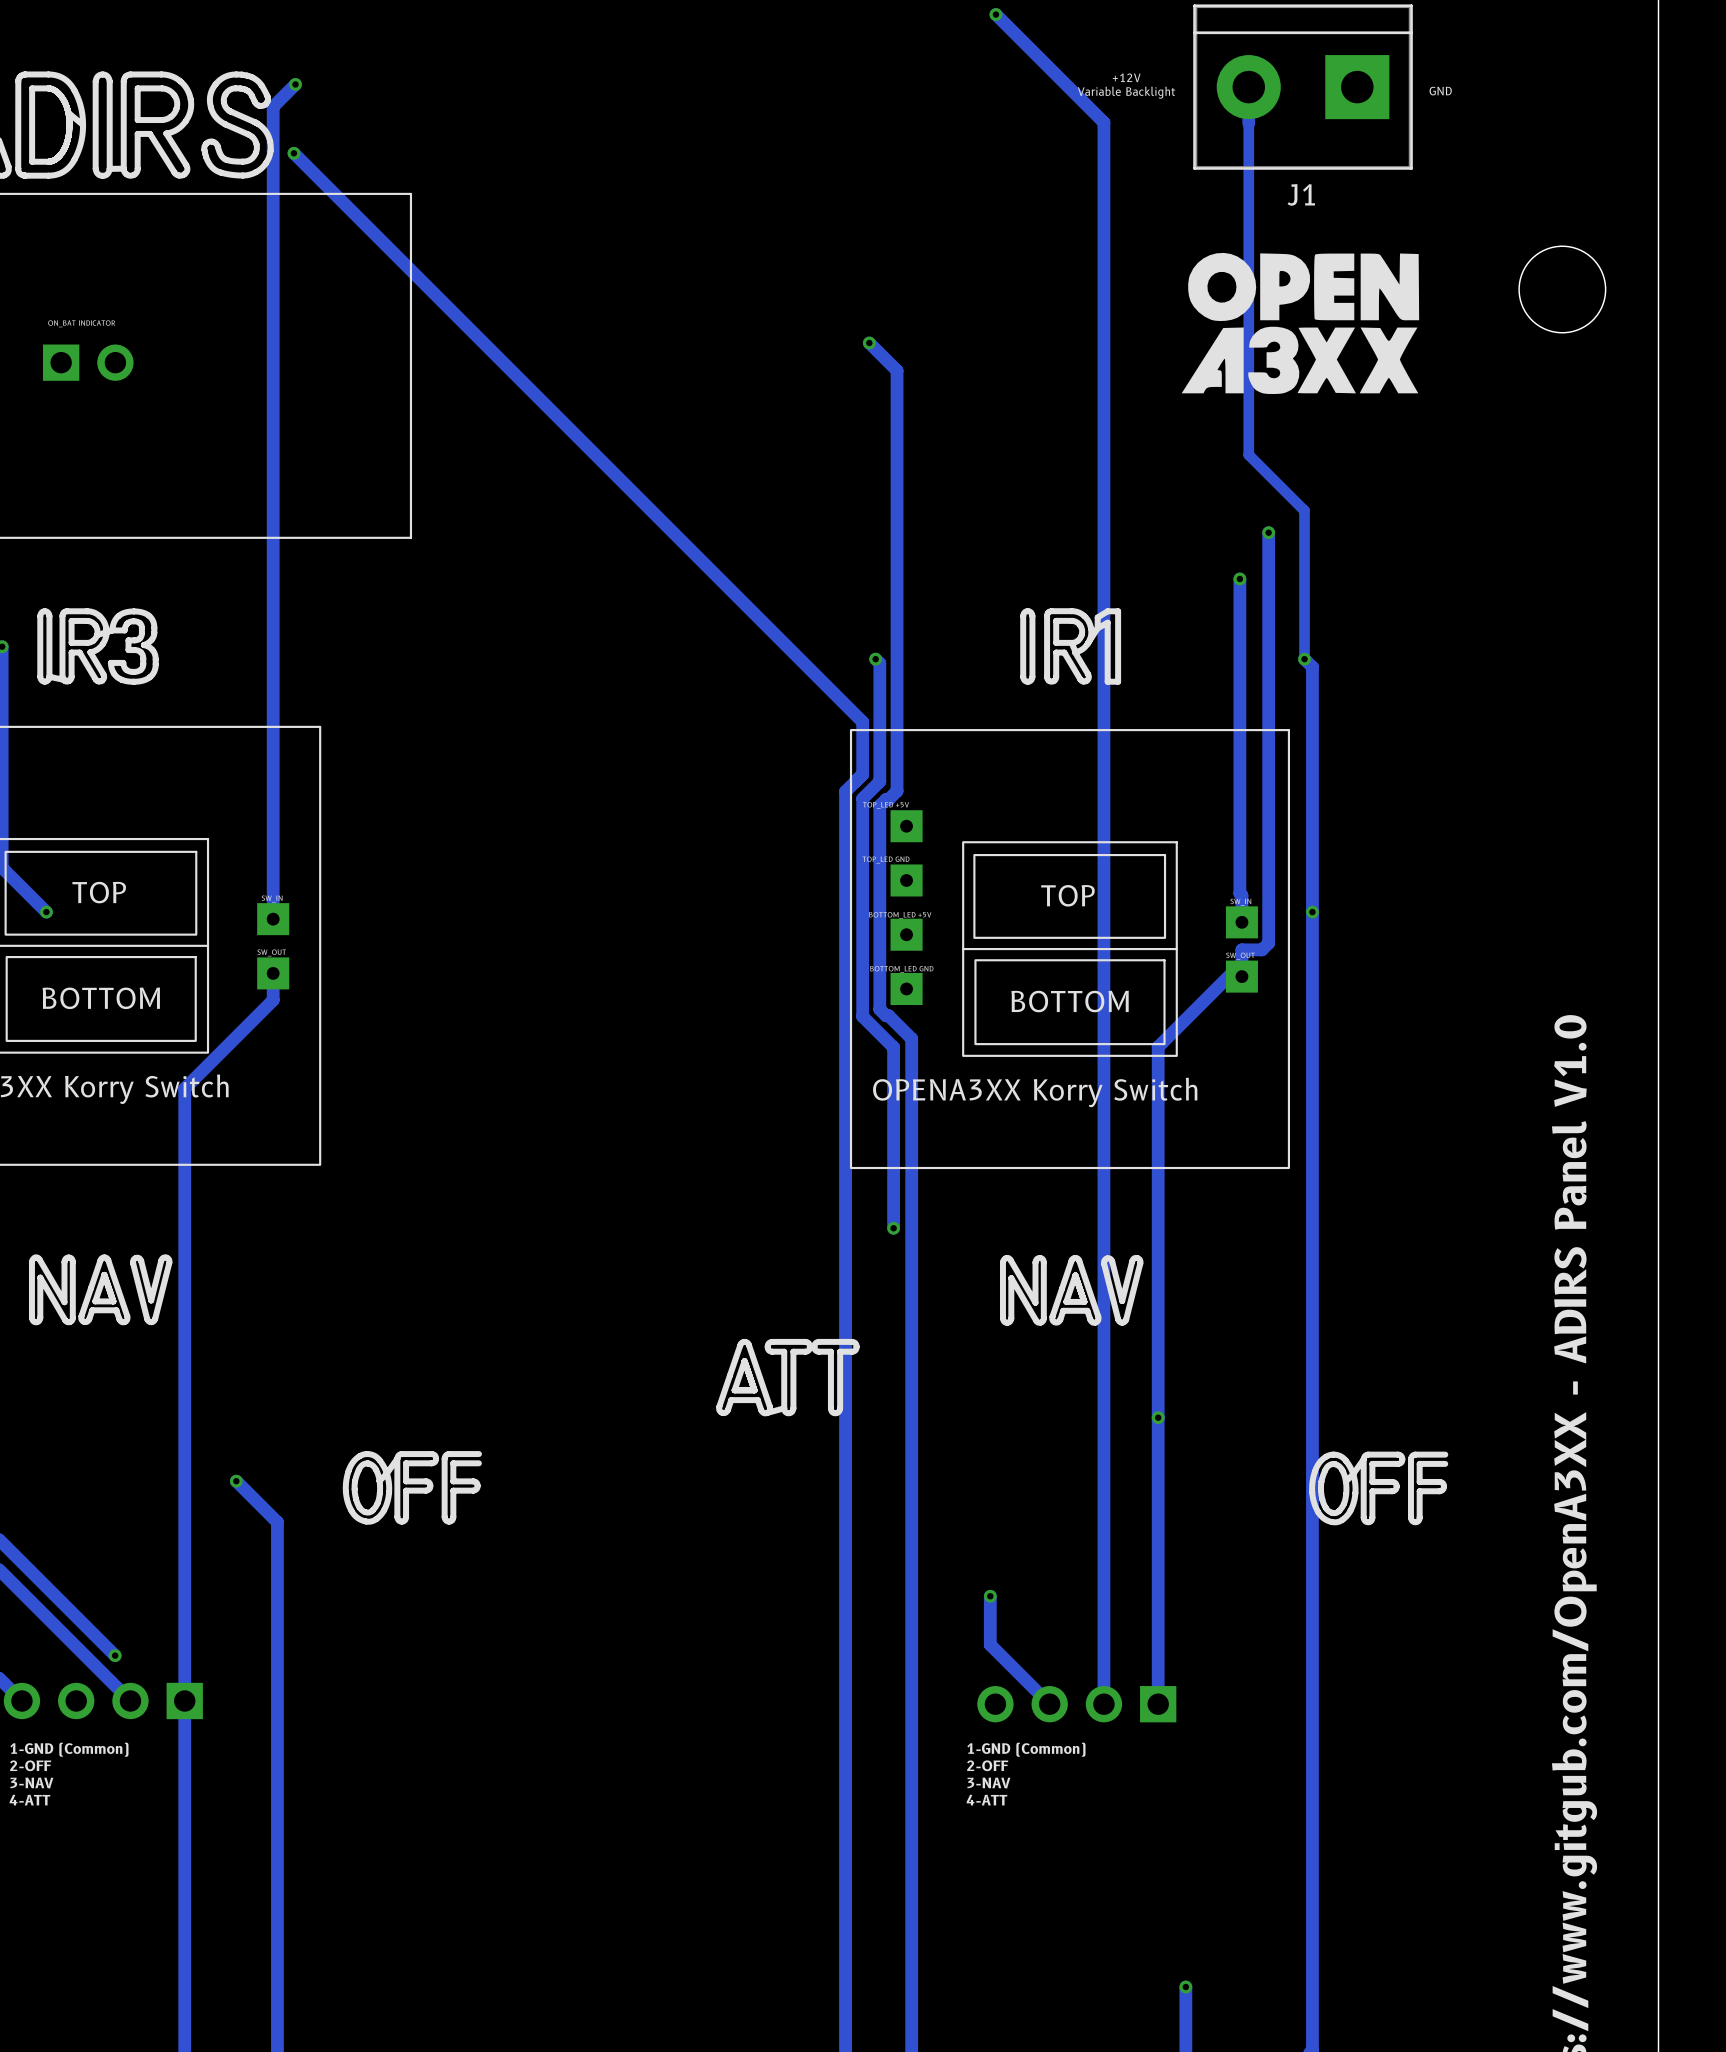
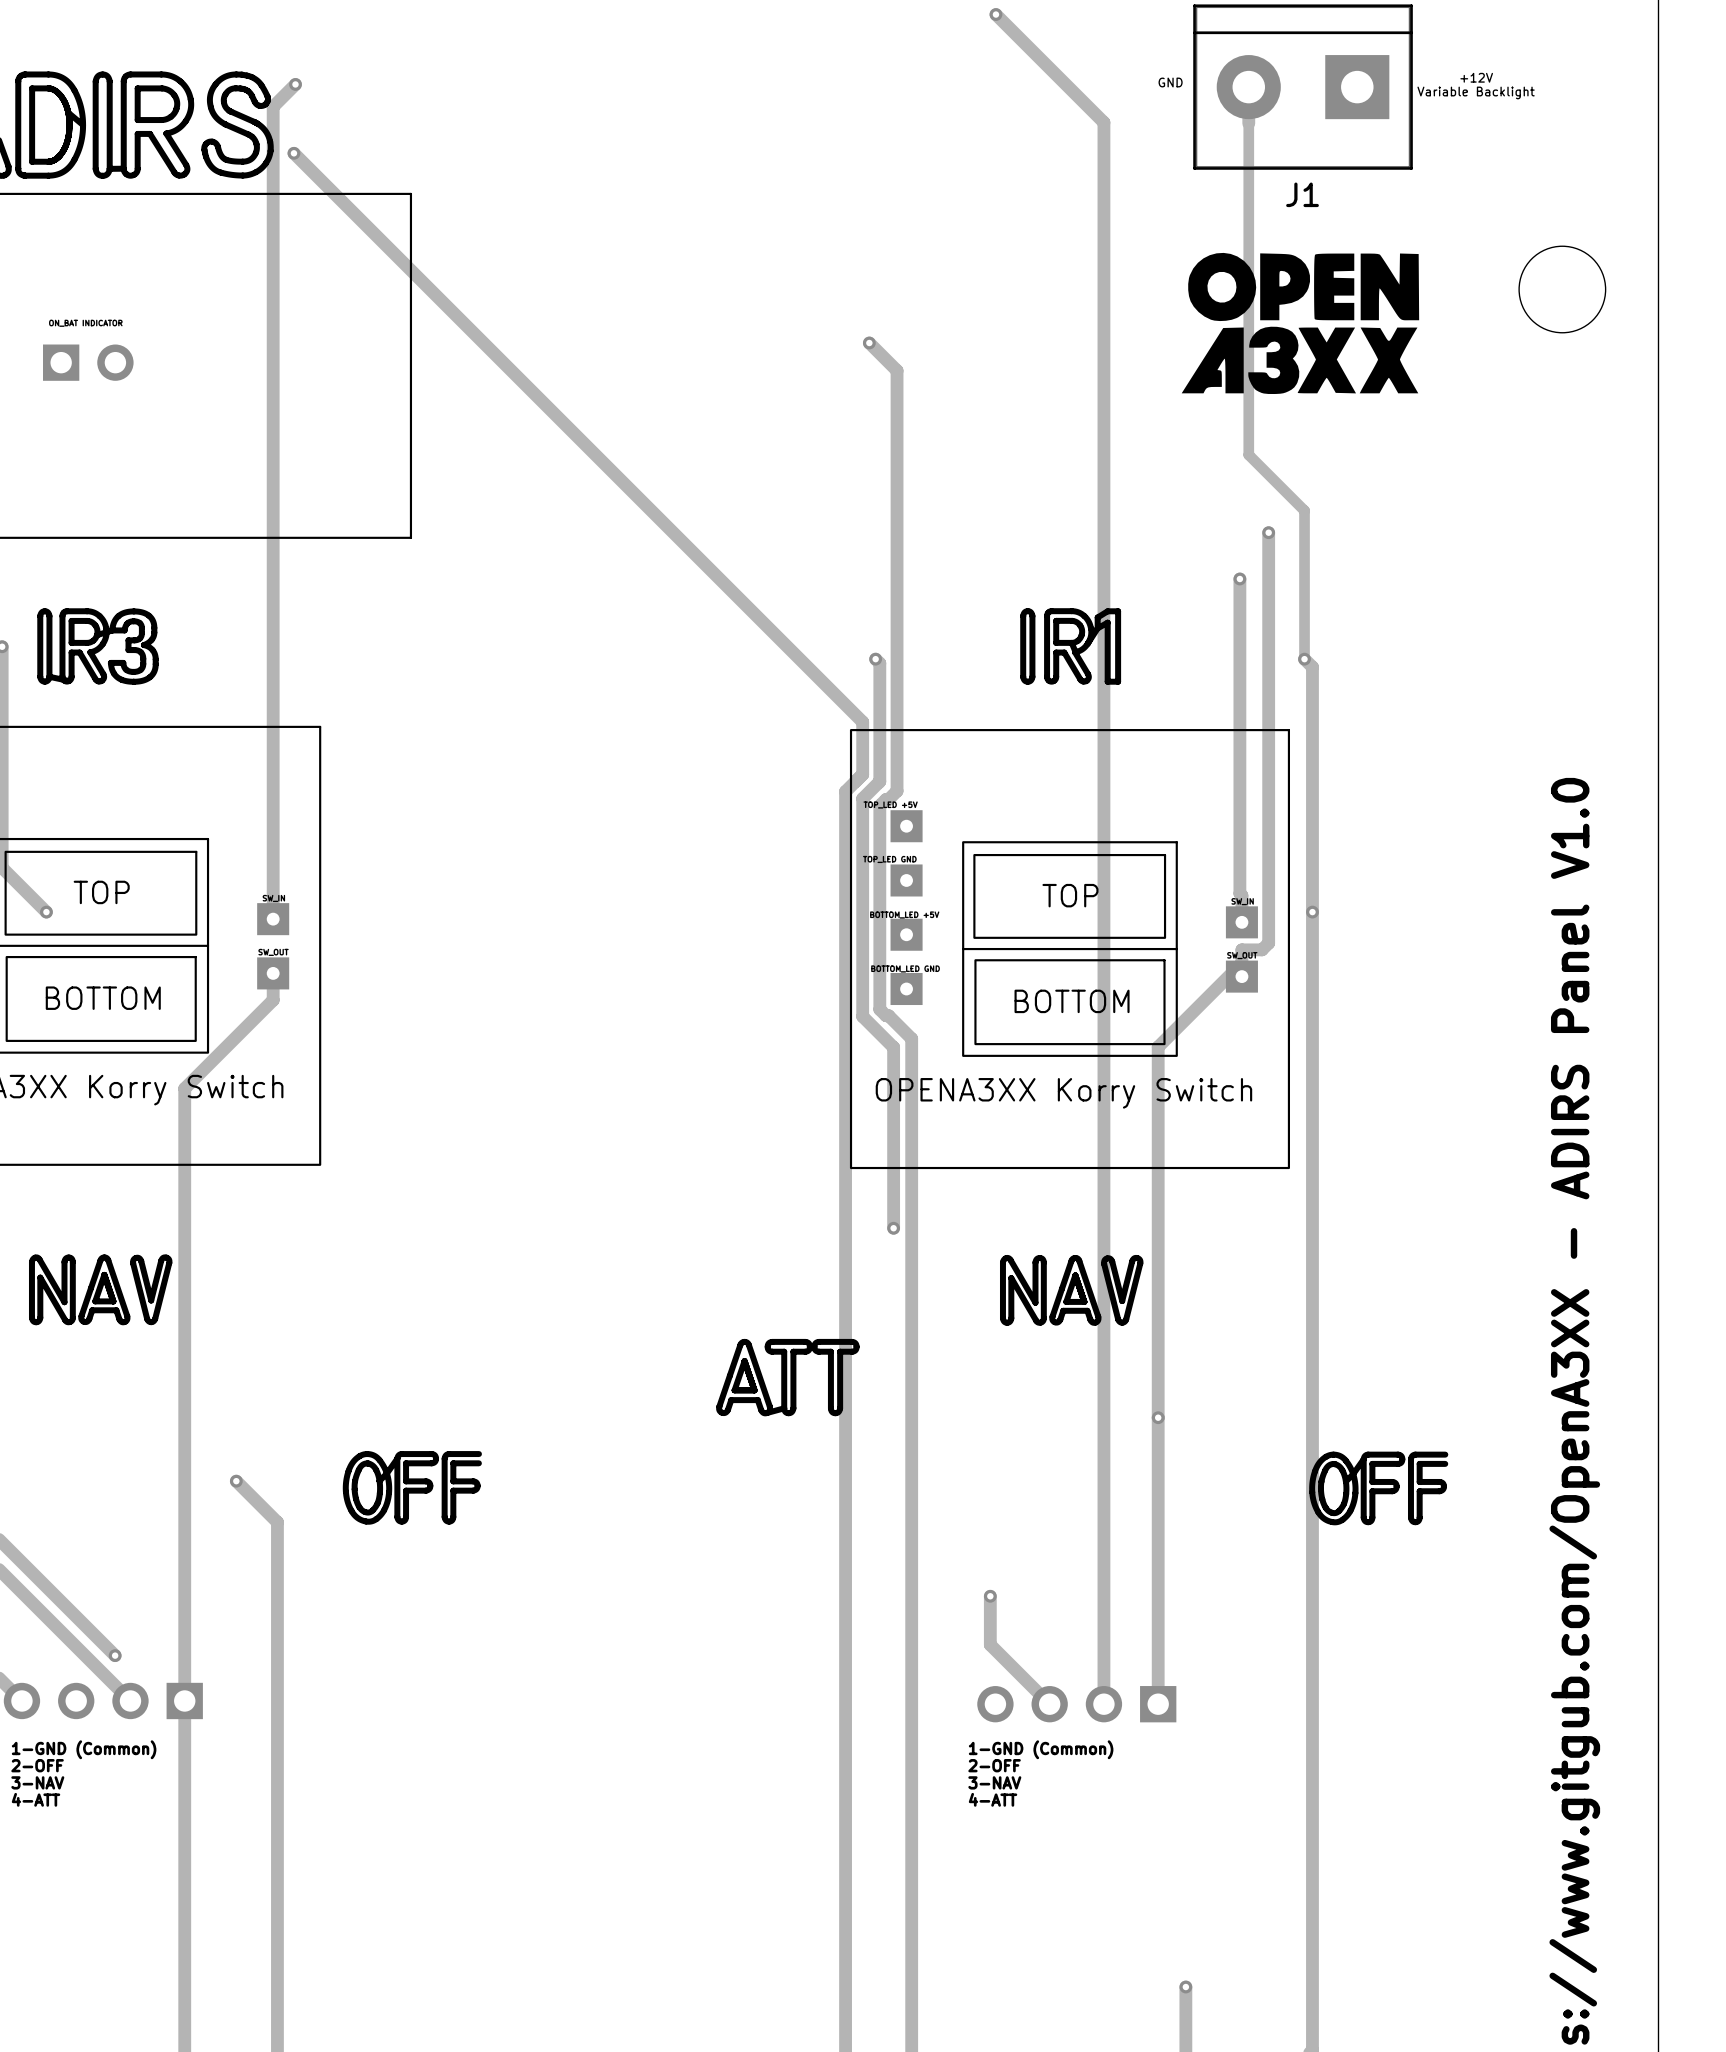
text position: +12V (1126, 77) -> +12V (1476, 77)
text position: GND (1440, 91) -> GND (1170, 82)
text position: Variable Backlight (1126, 92) -> Variable Backlight (1476, 92)

